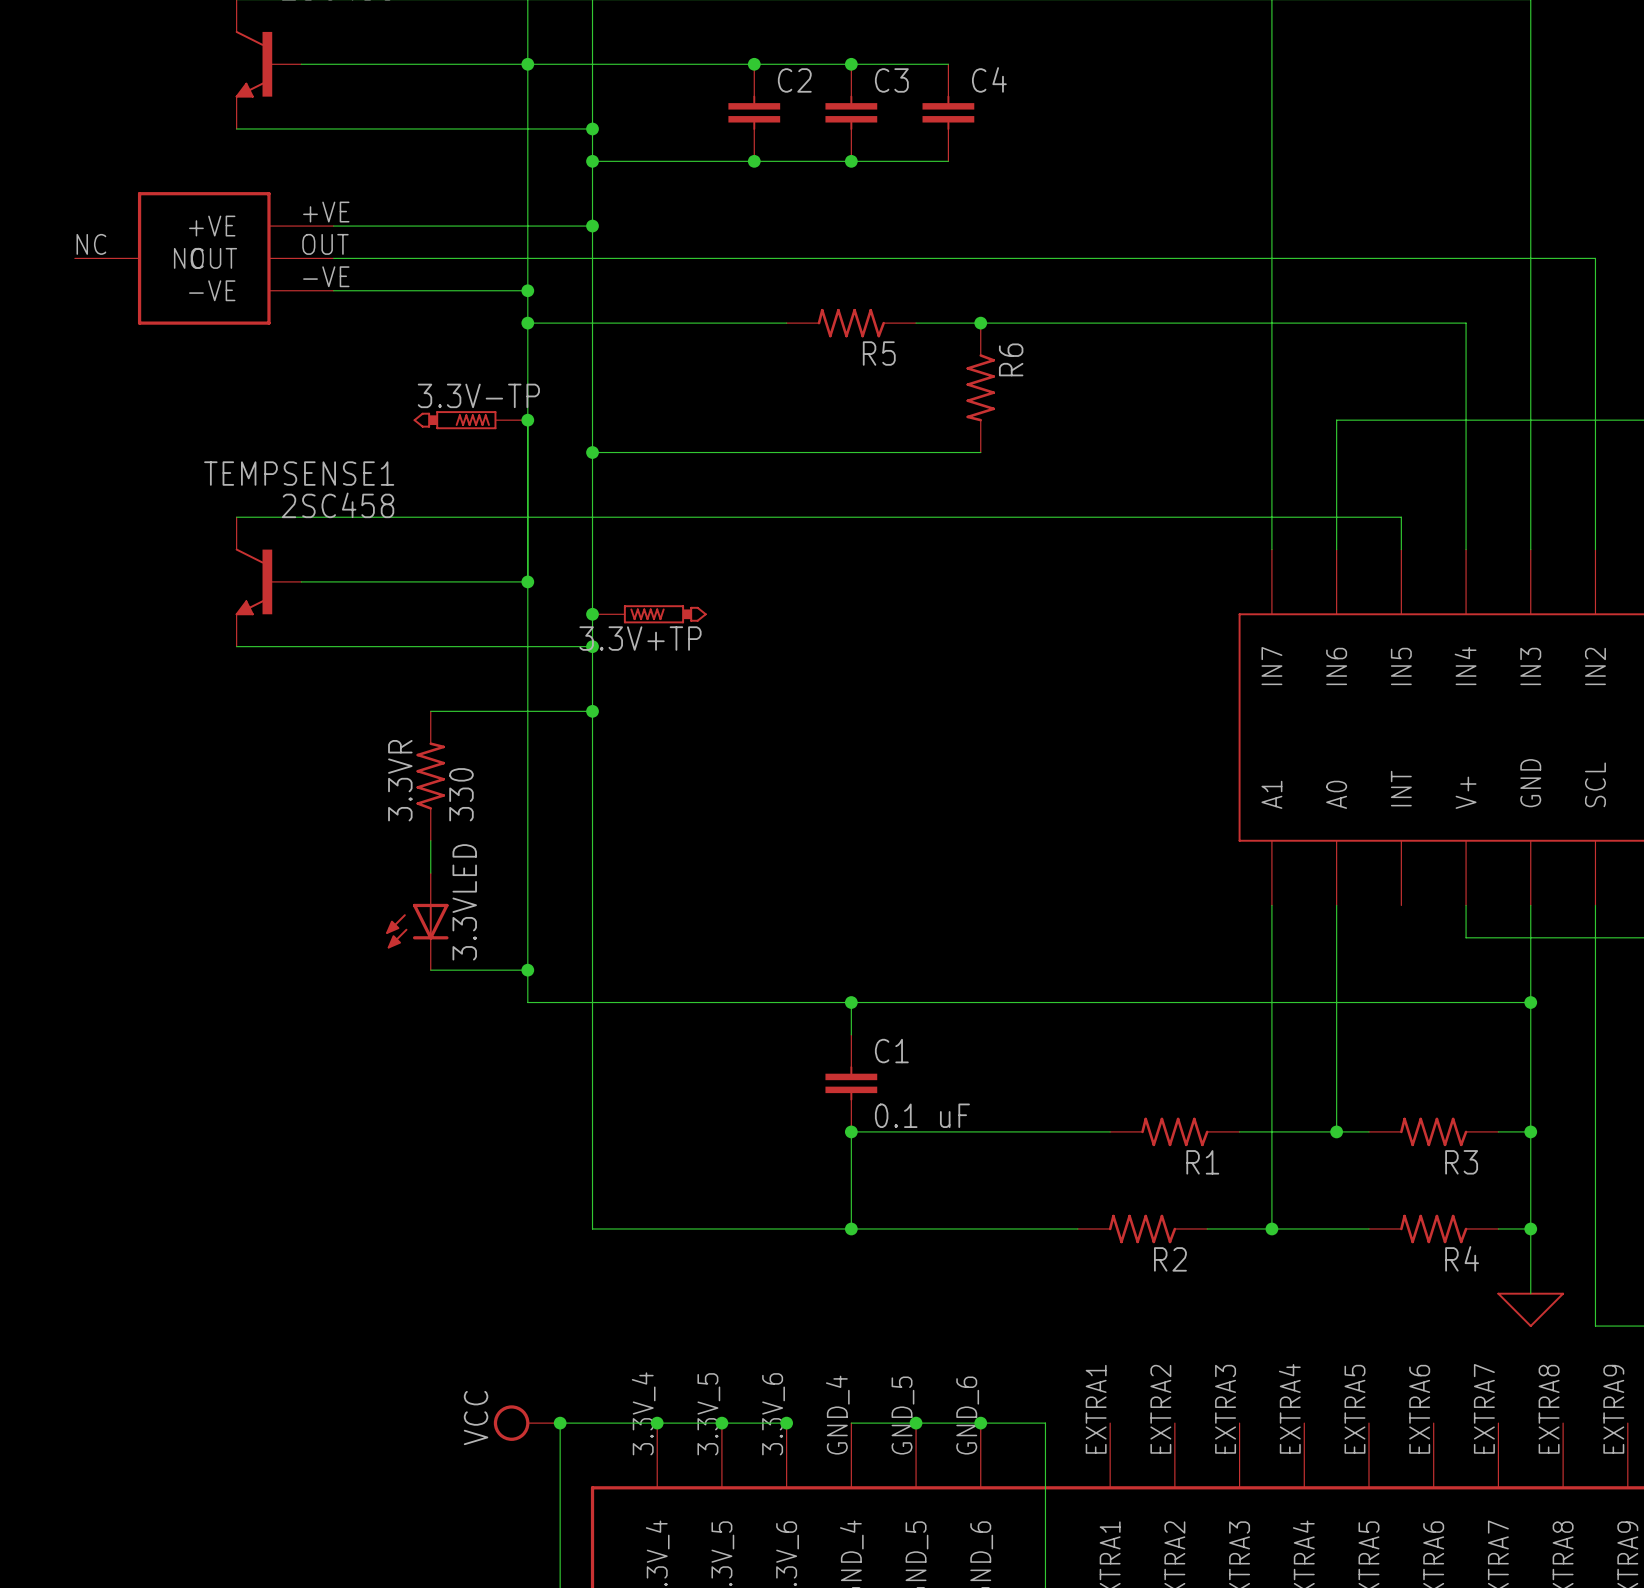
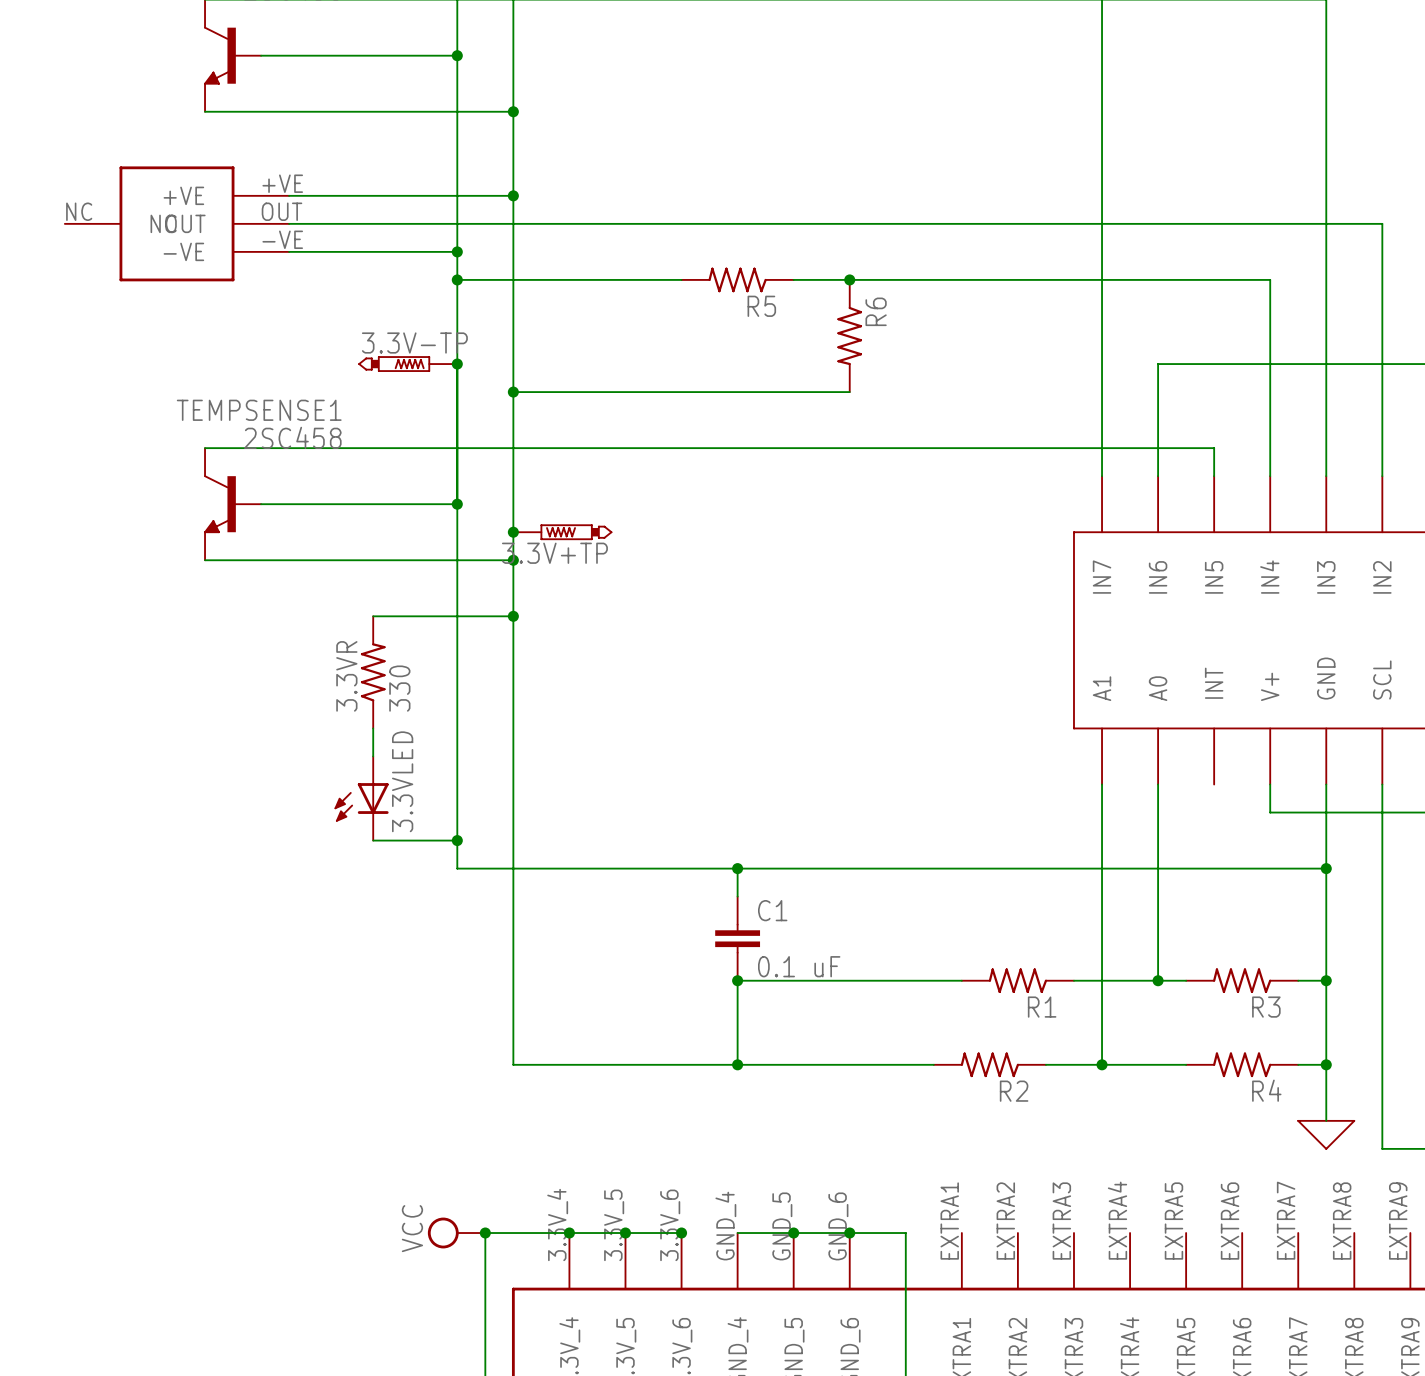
wire: (527, 64) (948, 64) -> none
junction: (754, 64) -> none
junction: (851, 64) -> none
C2: (754, 112) -> none
C3: (851, 112) -> none
C4: (948, 112) -> none
wire: (592, 161) (948, 161) -> none
junction: (592, 161) -> none
junction: (754, 161) -> none
junction: (851, 161) -> none

